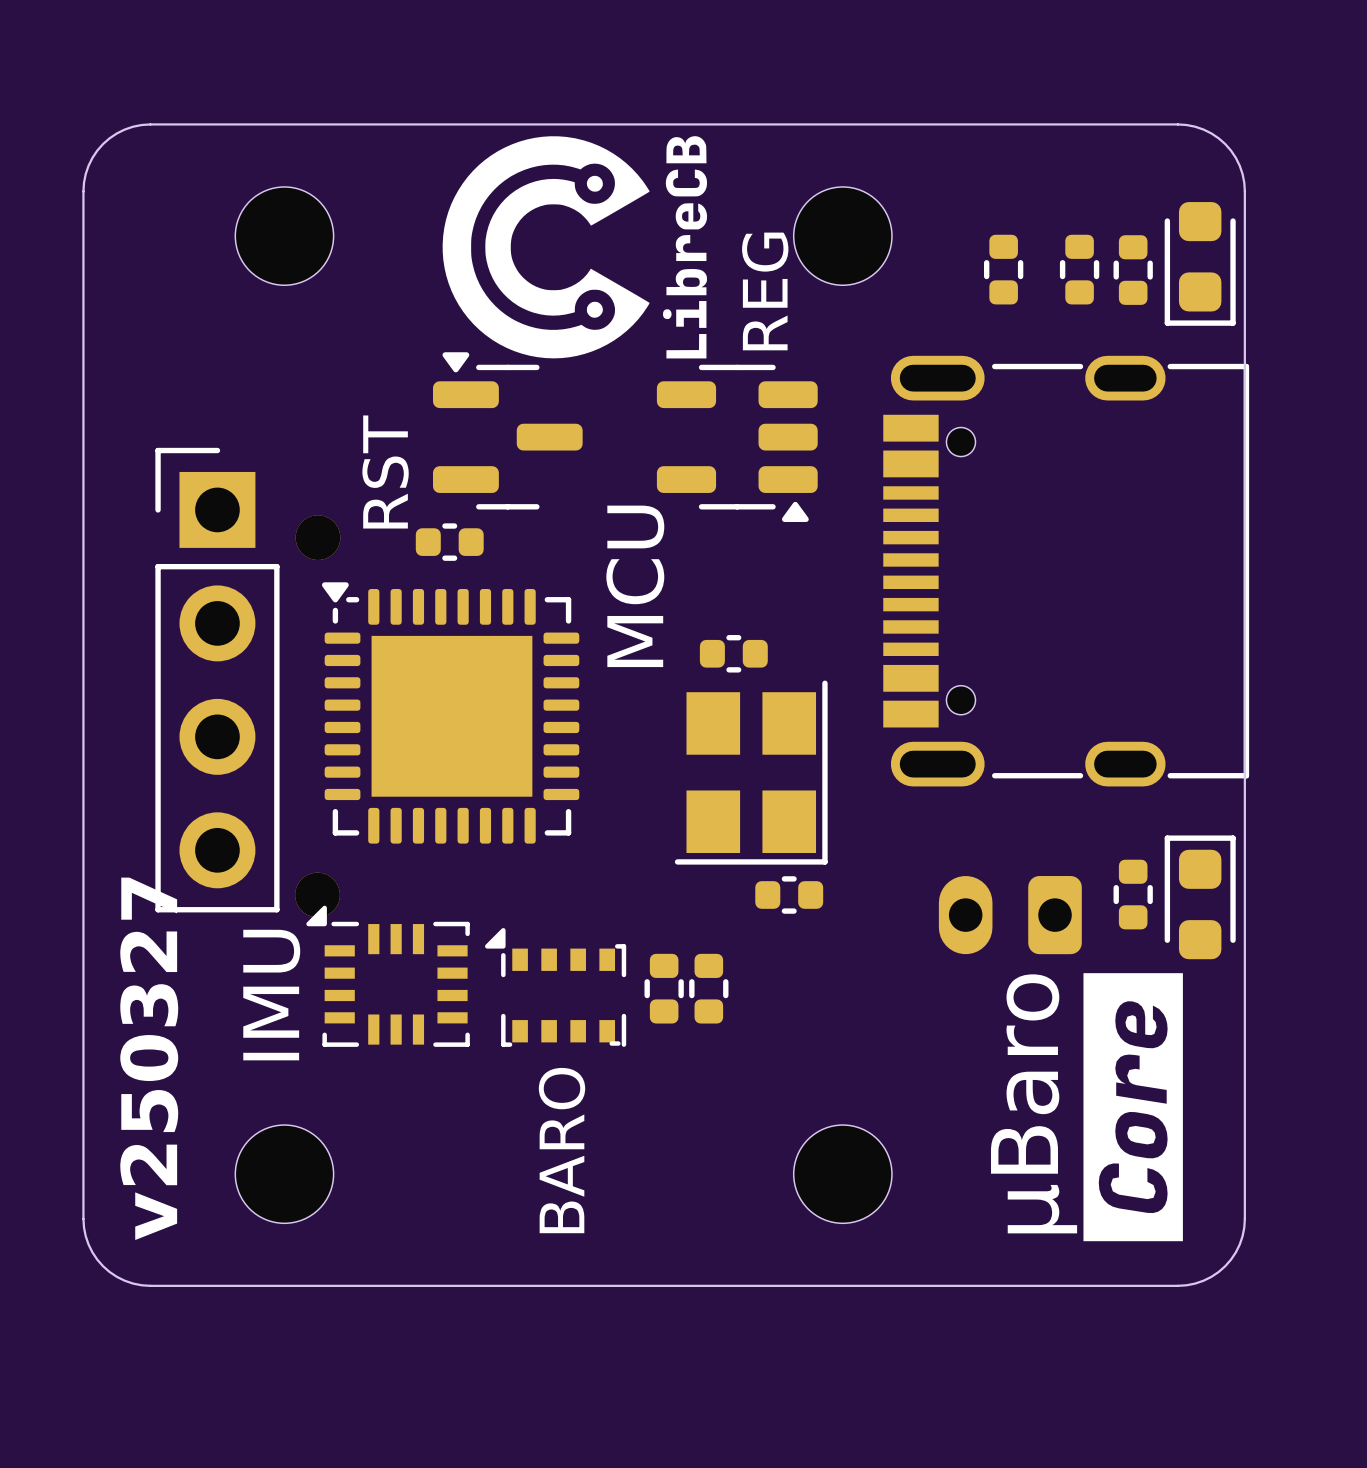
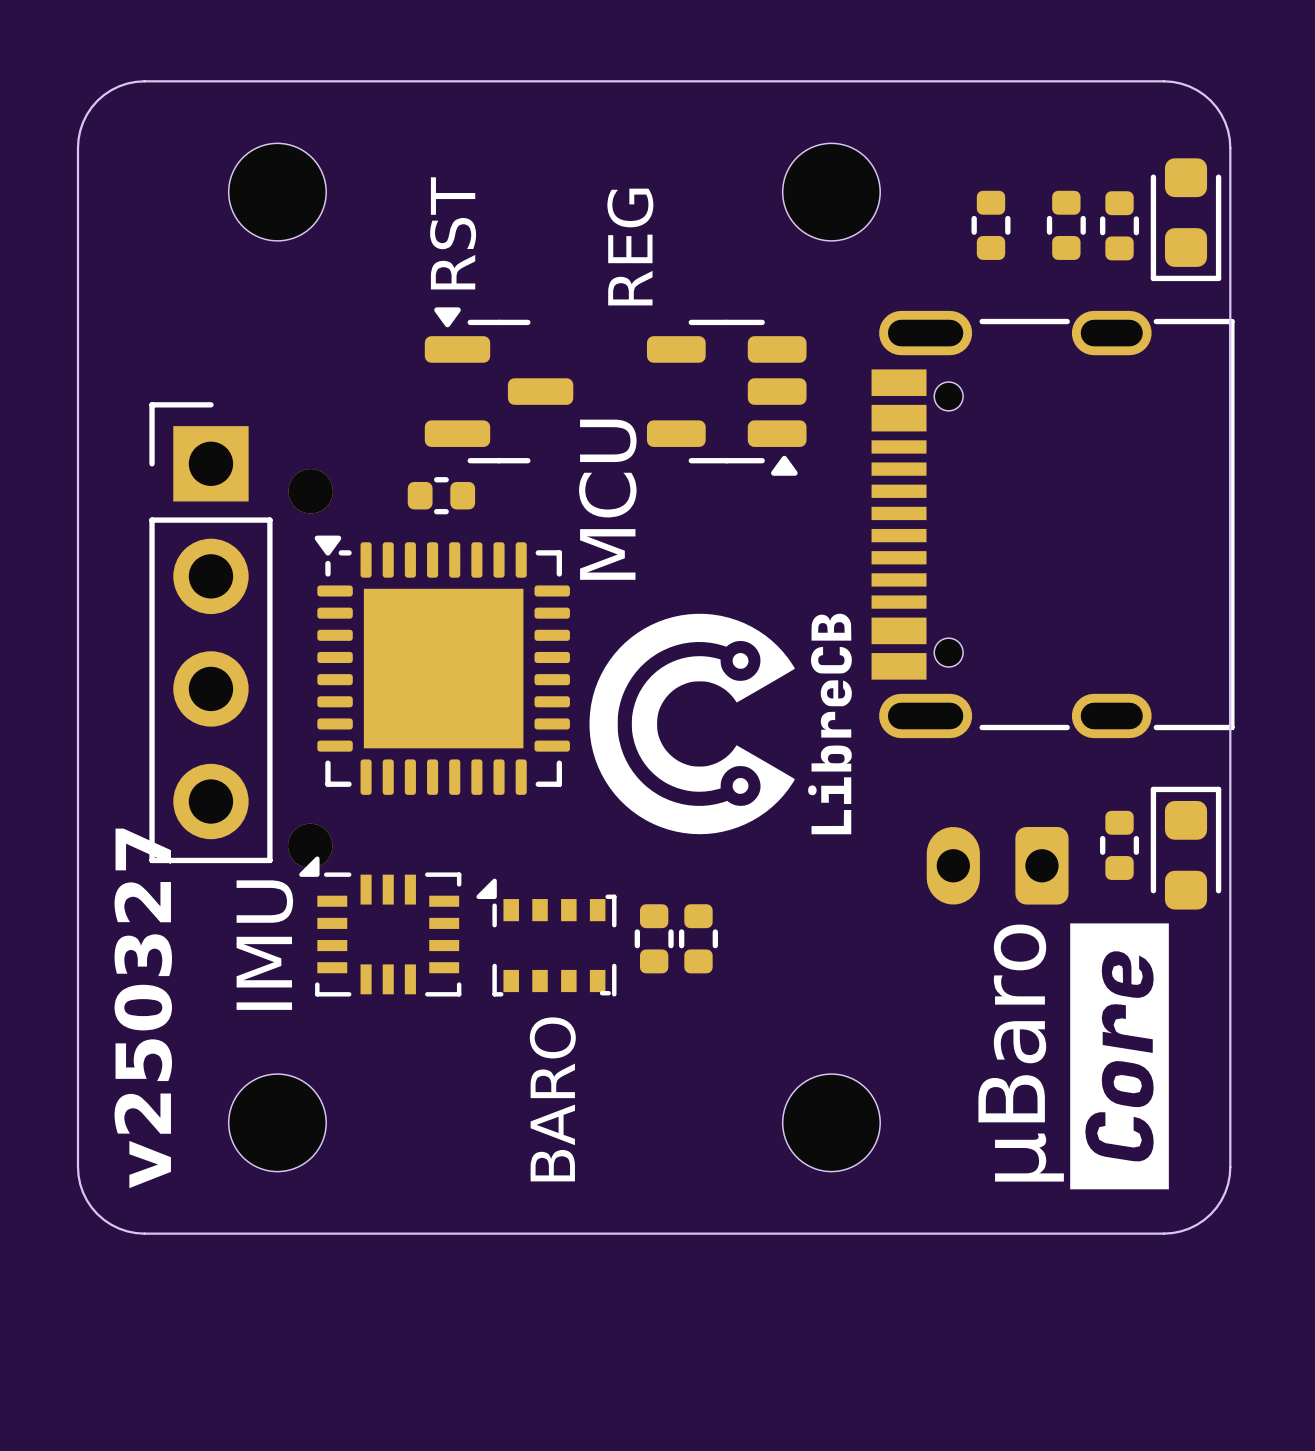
drawing position: (574, 247) -> (720, 723)
text position: REG (765, 291) -> REG (630, 247)
text position: RST (385, 472) -> RST (453, 233)
text position: MCU (635, 586) -> MCU (607, 499)
part: (733, 653) -> none
part: (751, 772) -> none
part: (789, 894) -> none

